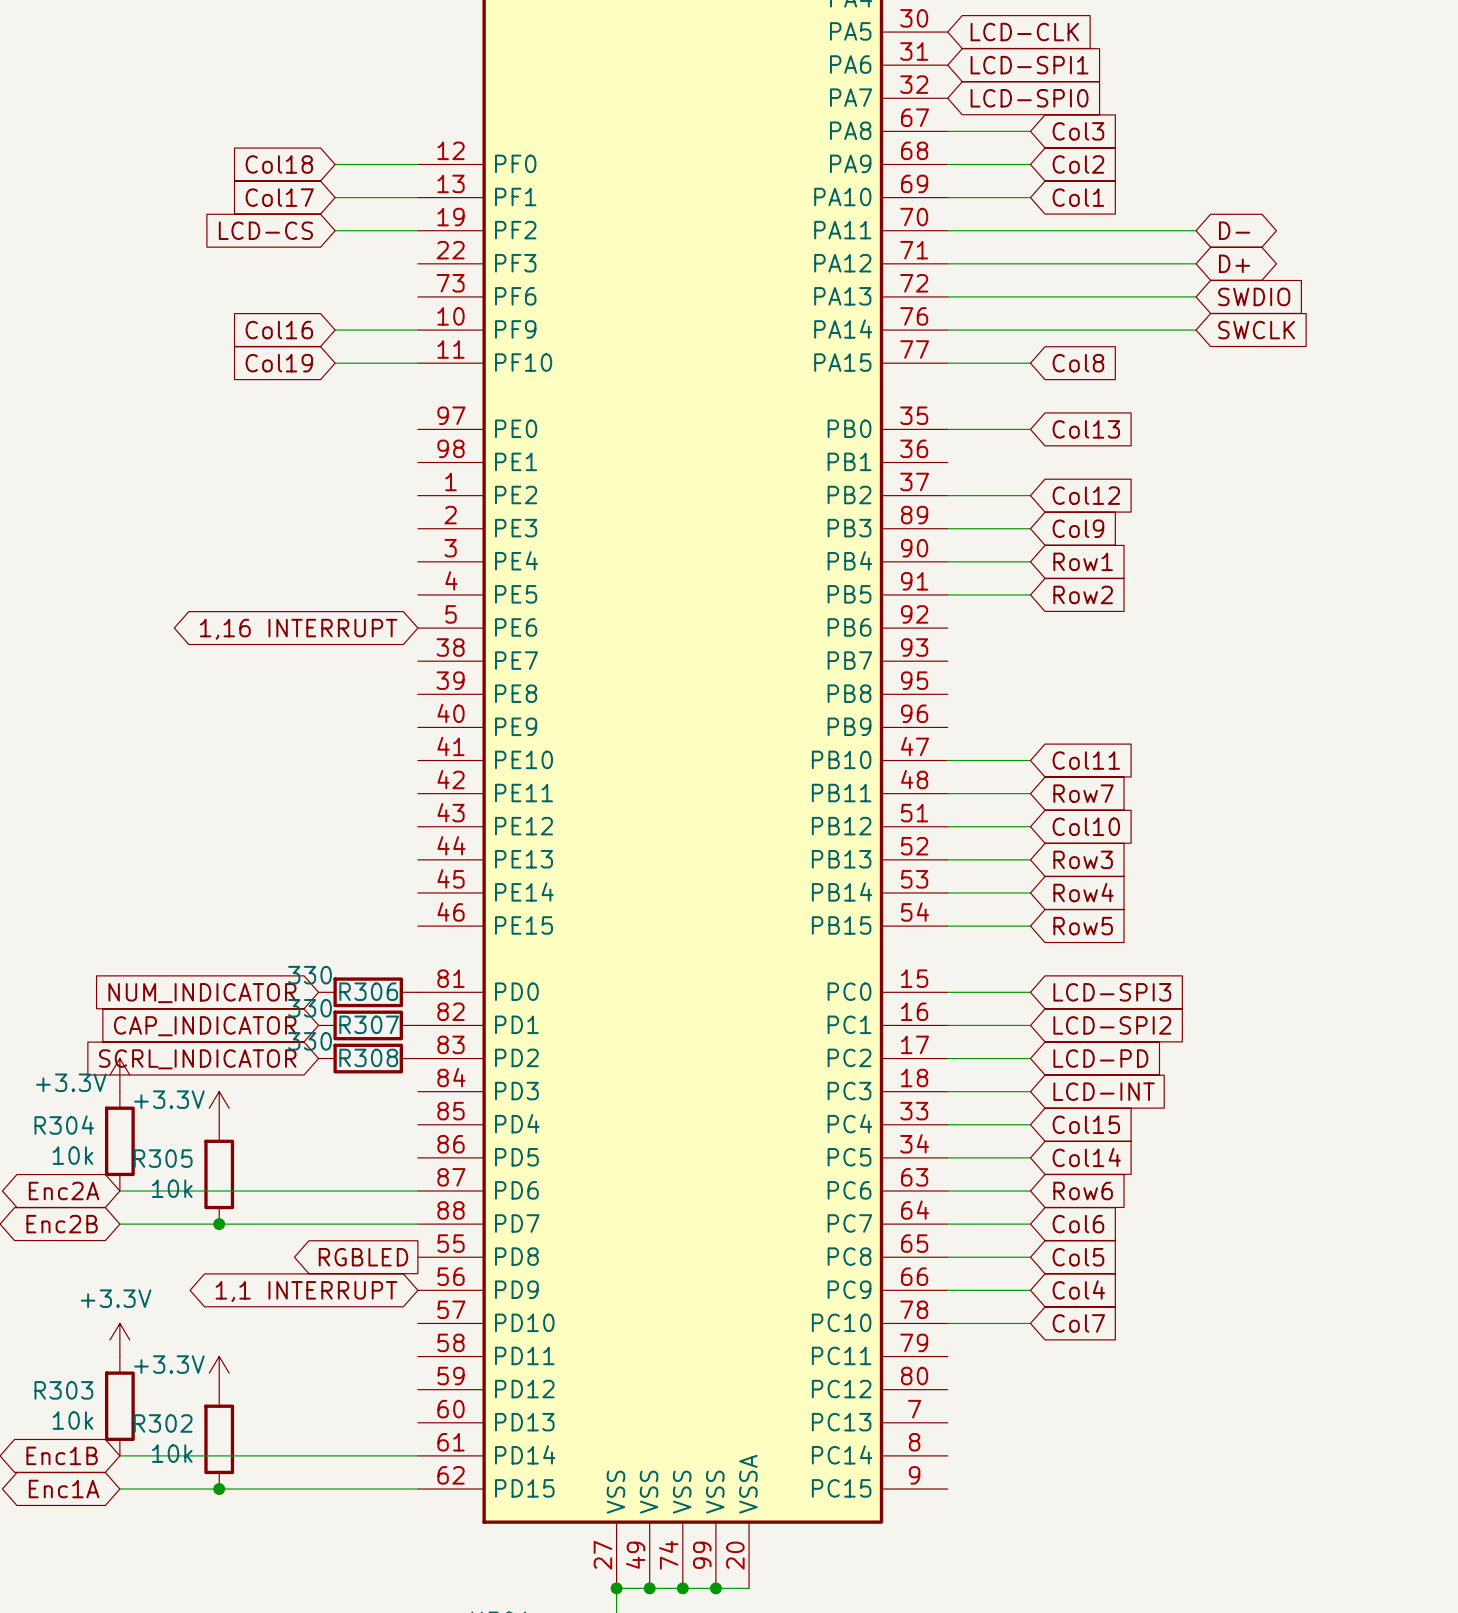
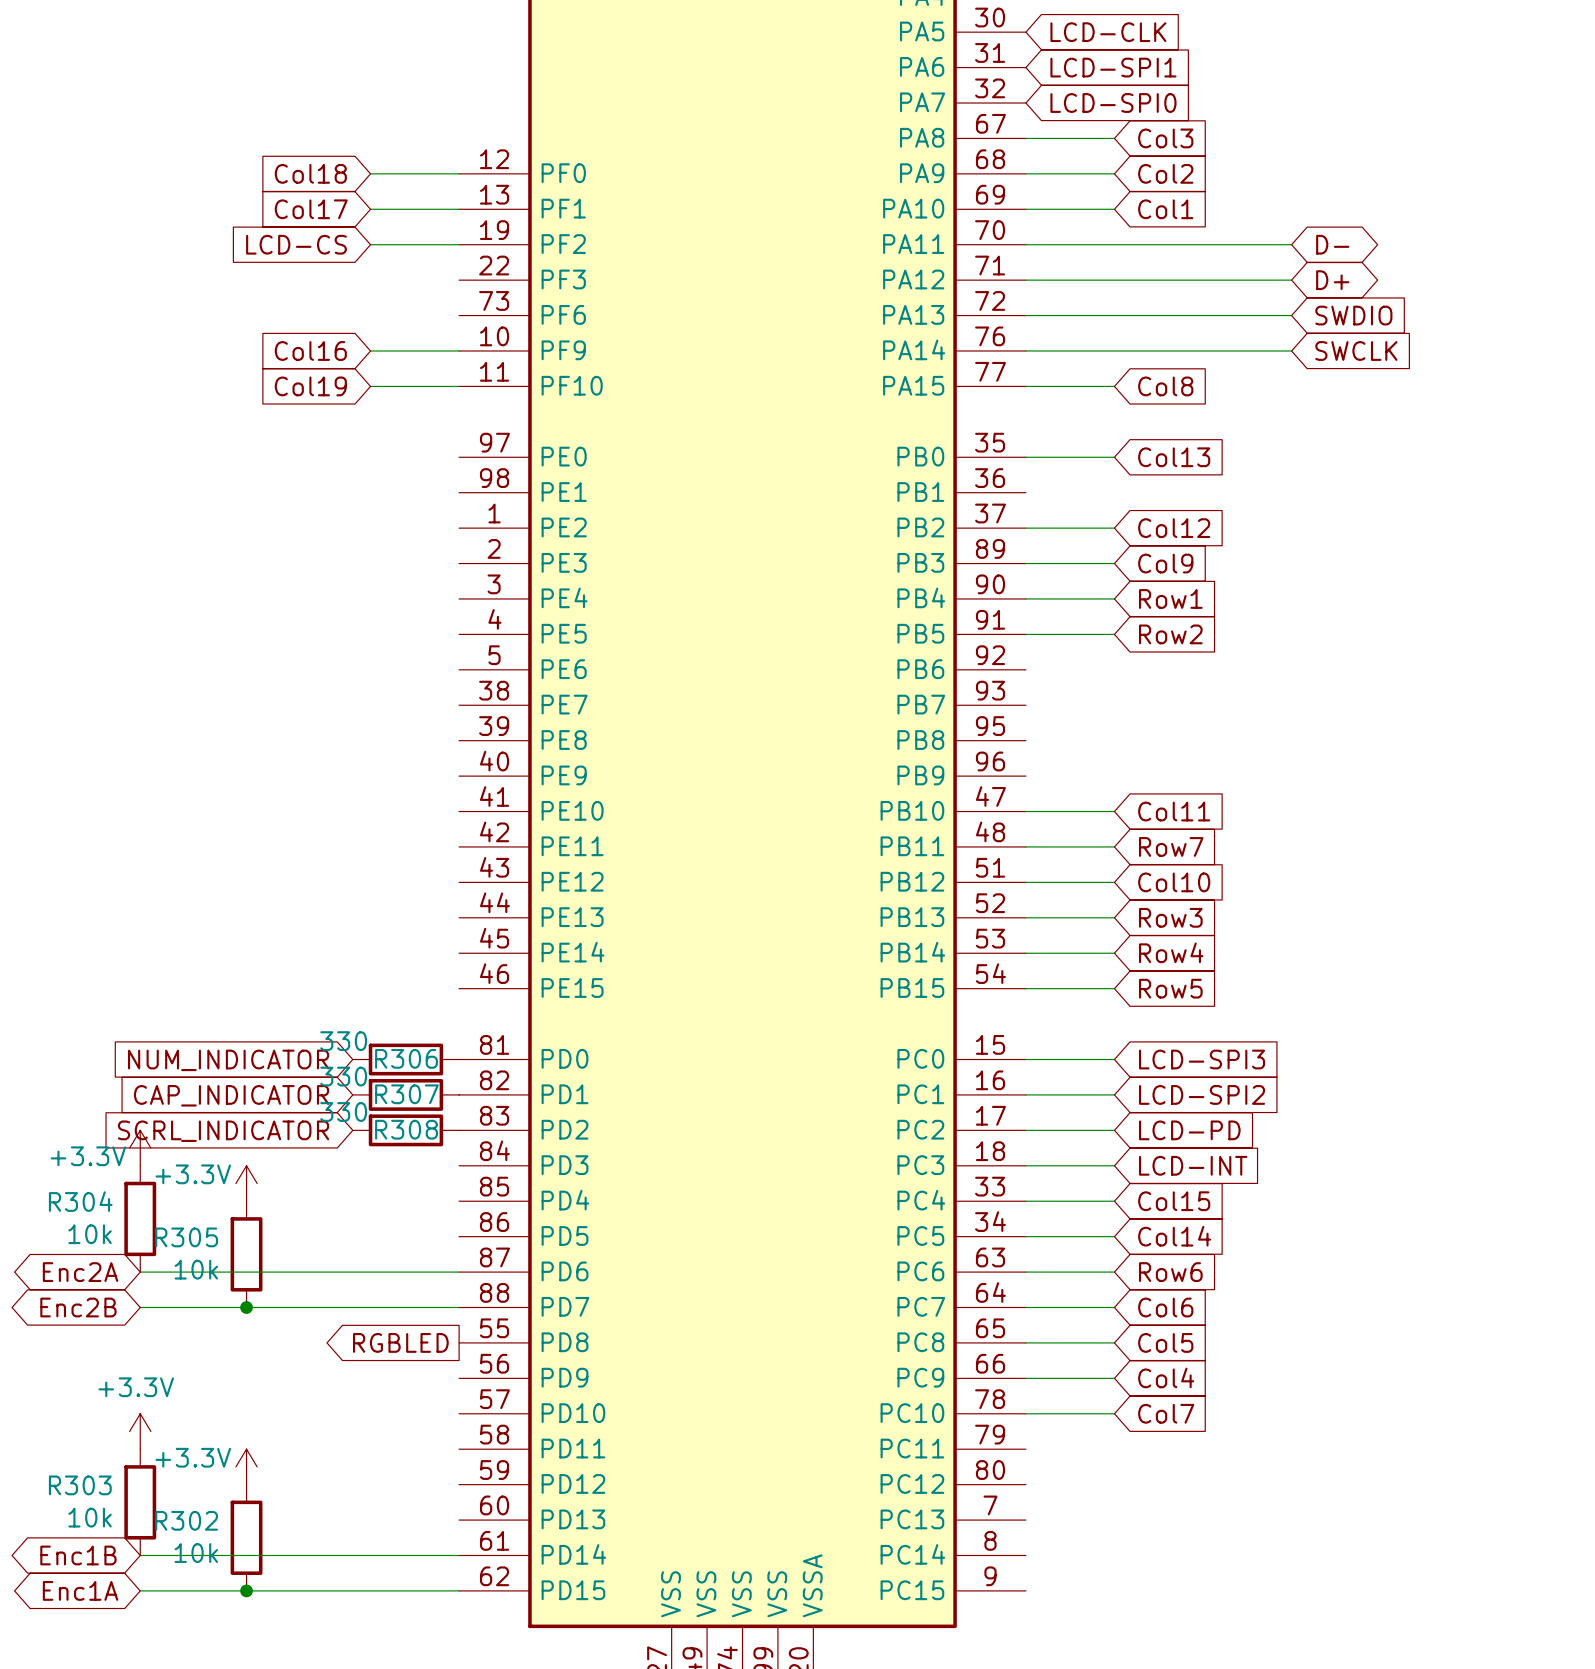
global label: 1,16 INTERRUPT (298, 629) -> none
global label: 1,1 INTERRUPT (306, 1291) -> none

